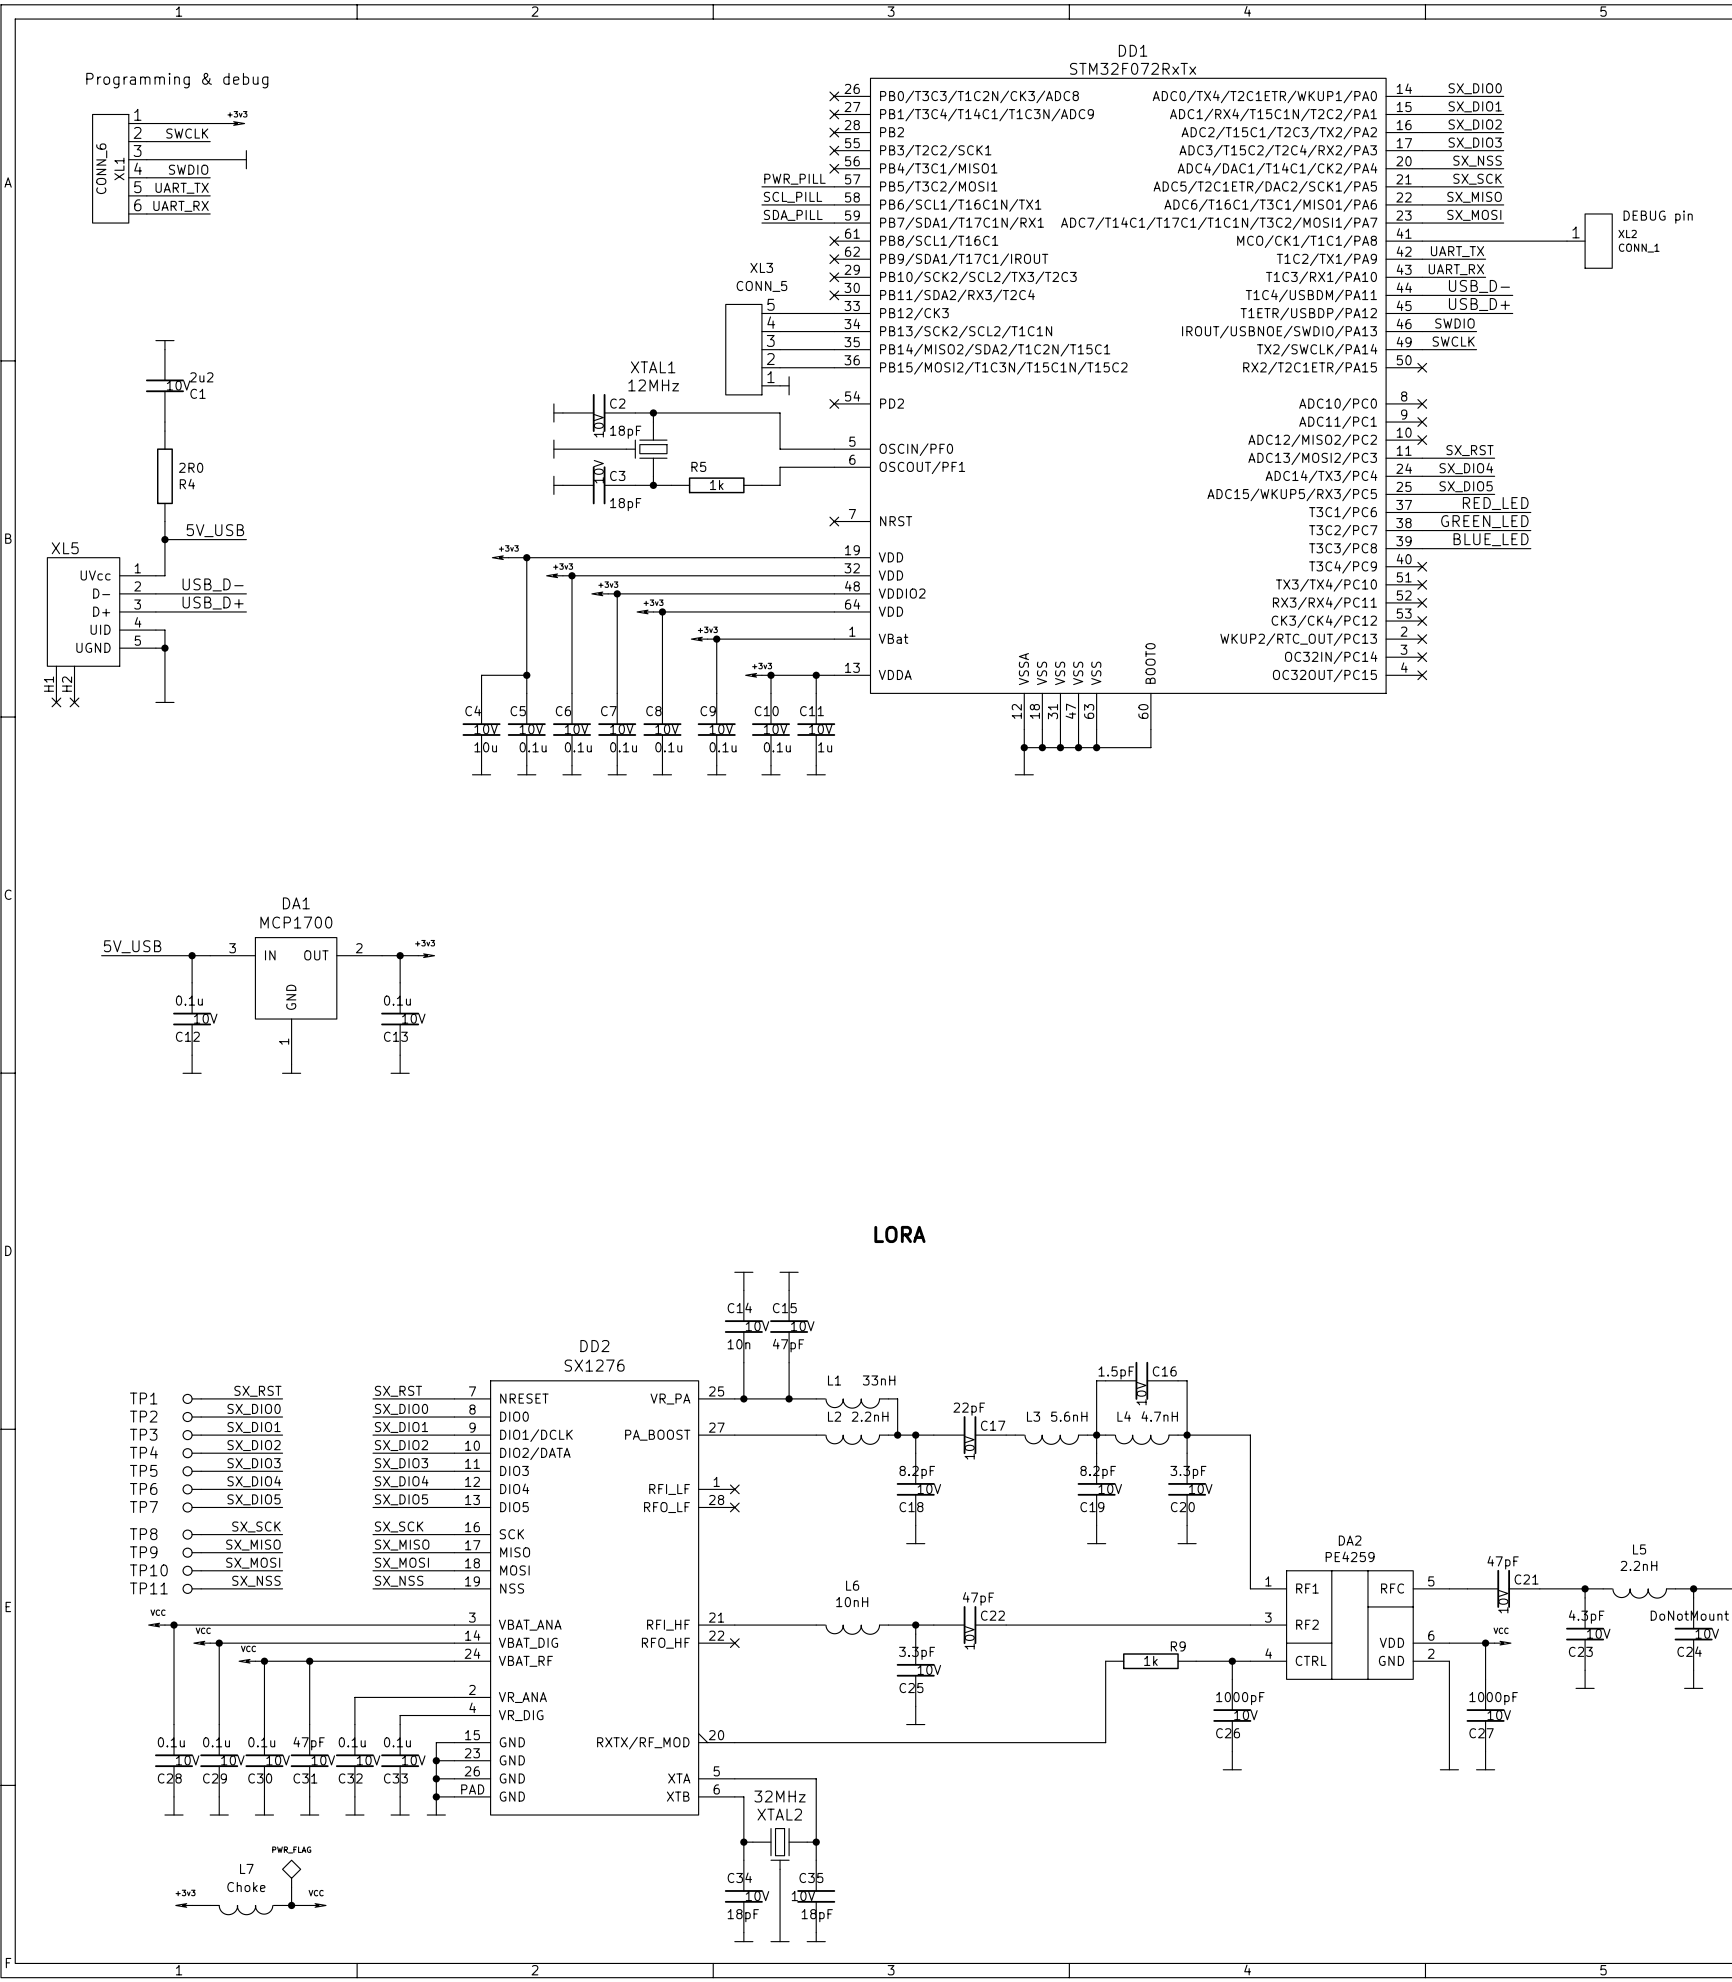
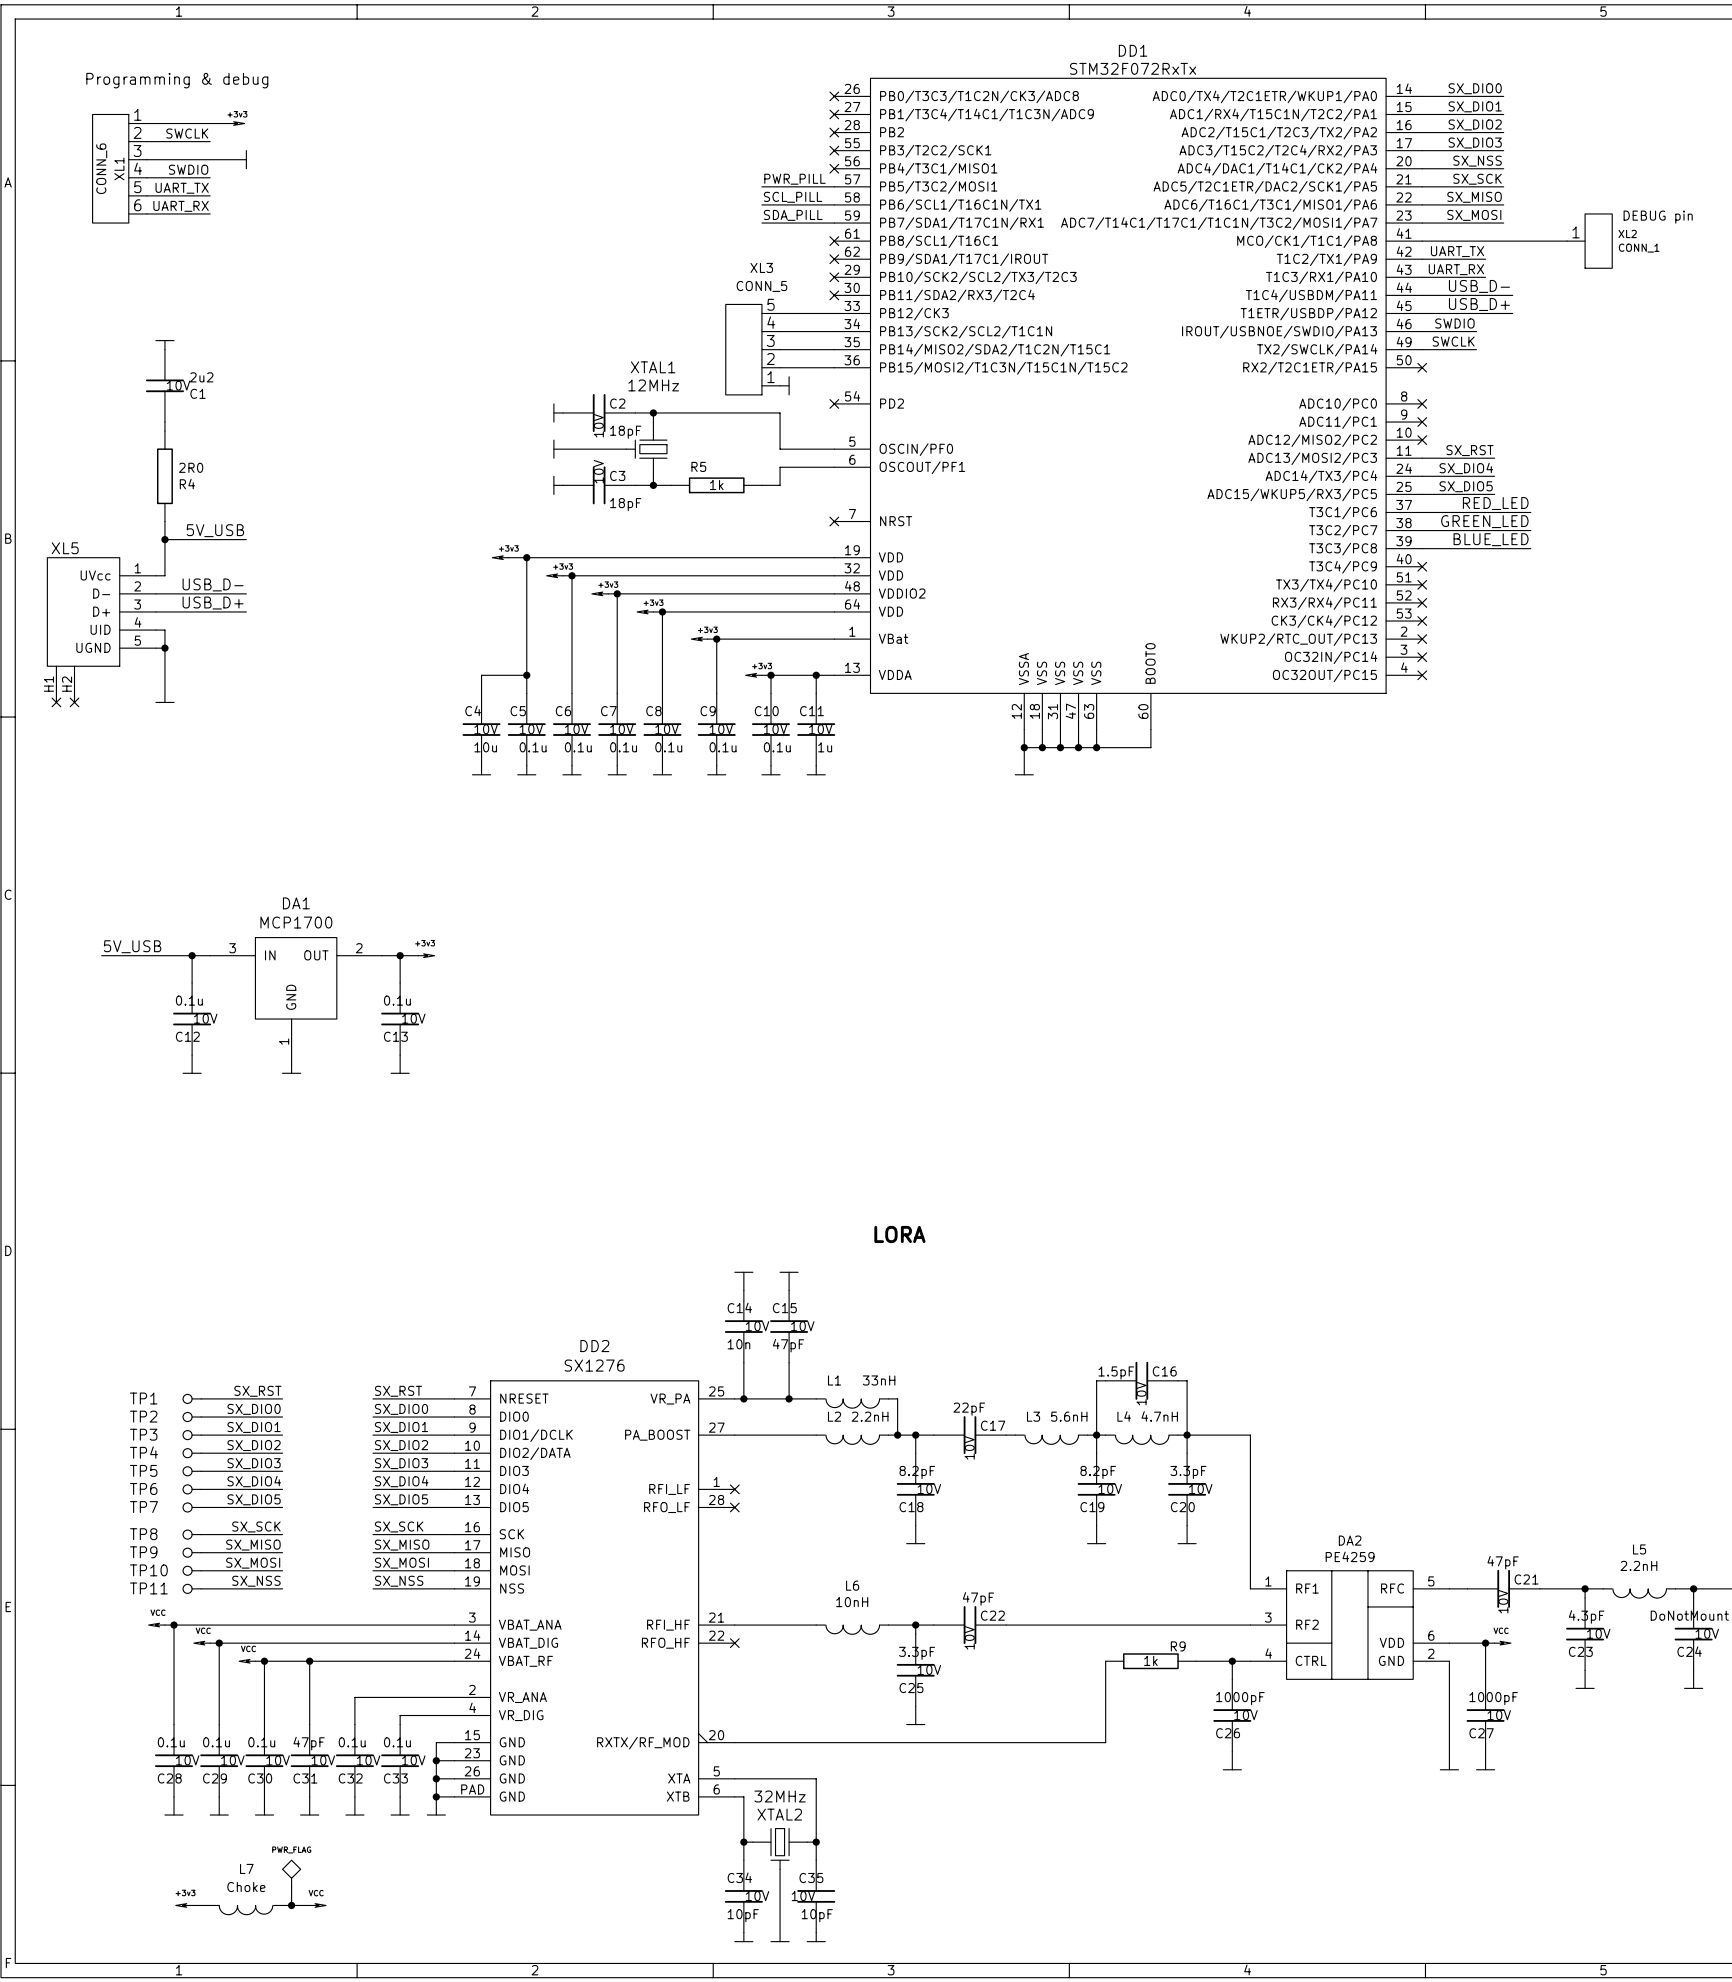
C34 value: 18pF (743, 1915) -> 10pF (743, 1915)
C35 value: 18pF (817, 1915) -> 10pF (817, 1915)

